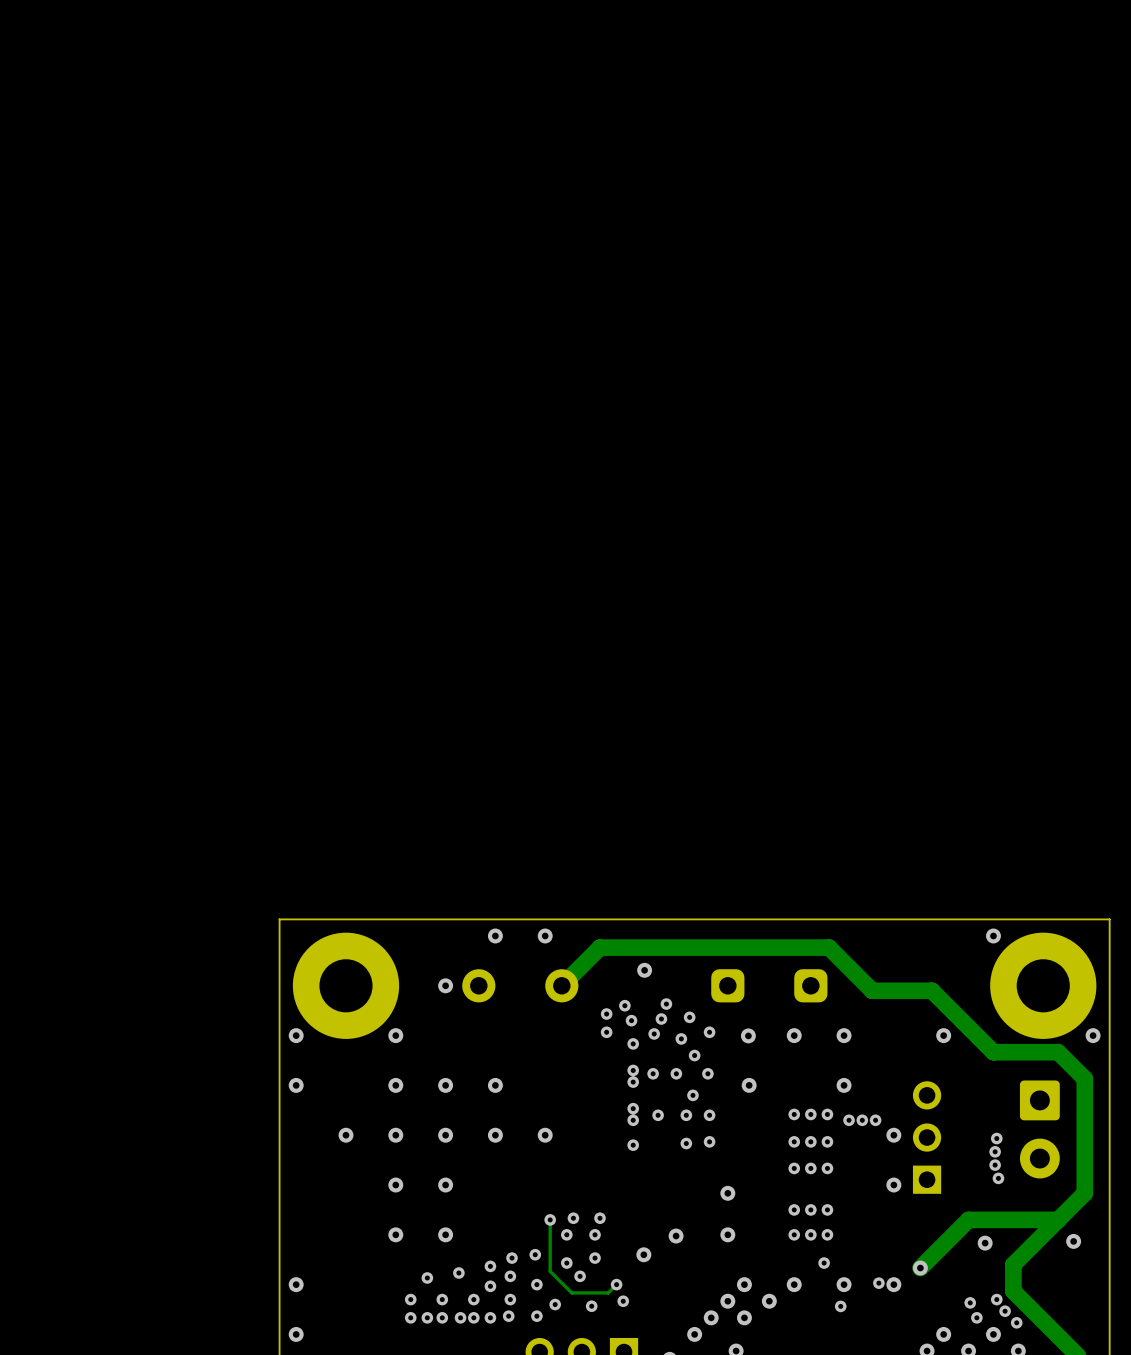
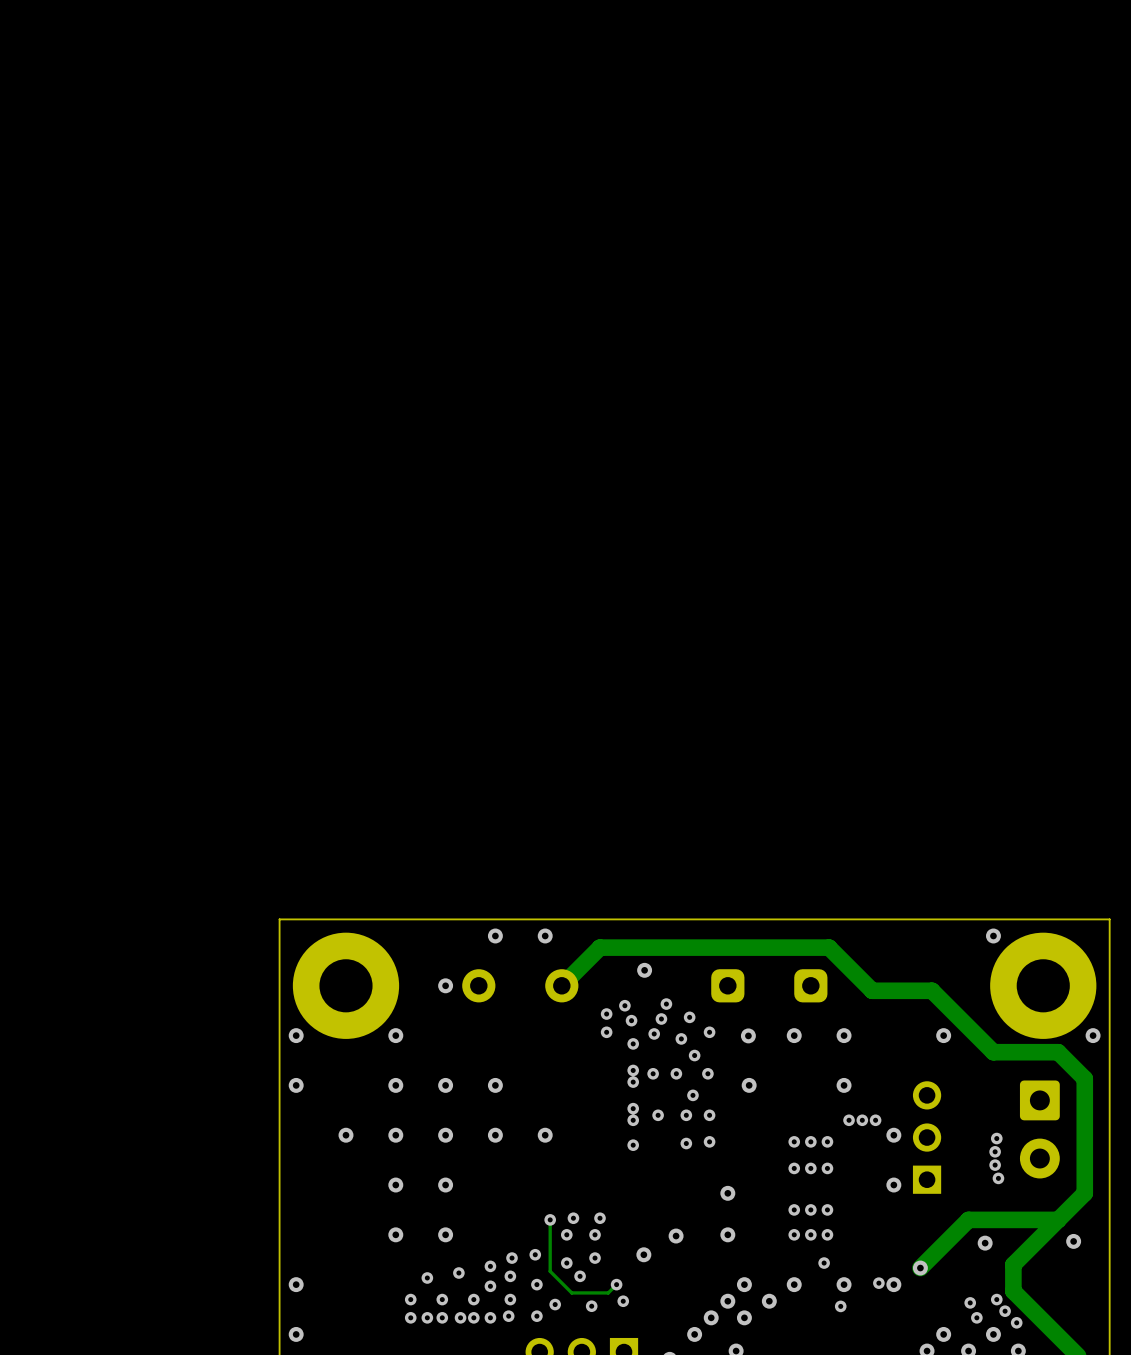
via: (794, 1114) -> none
via: (810, 1114) -> none
via: (827, 1114) -> none

